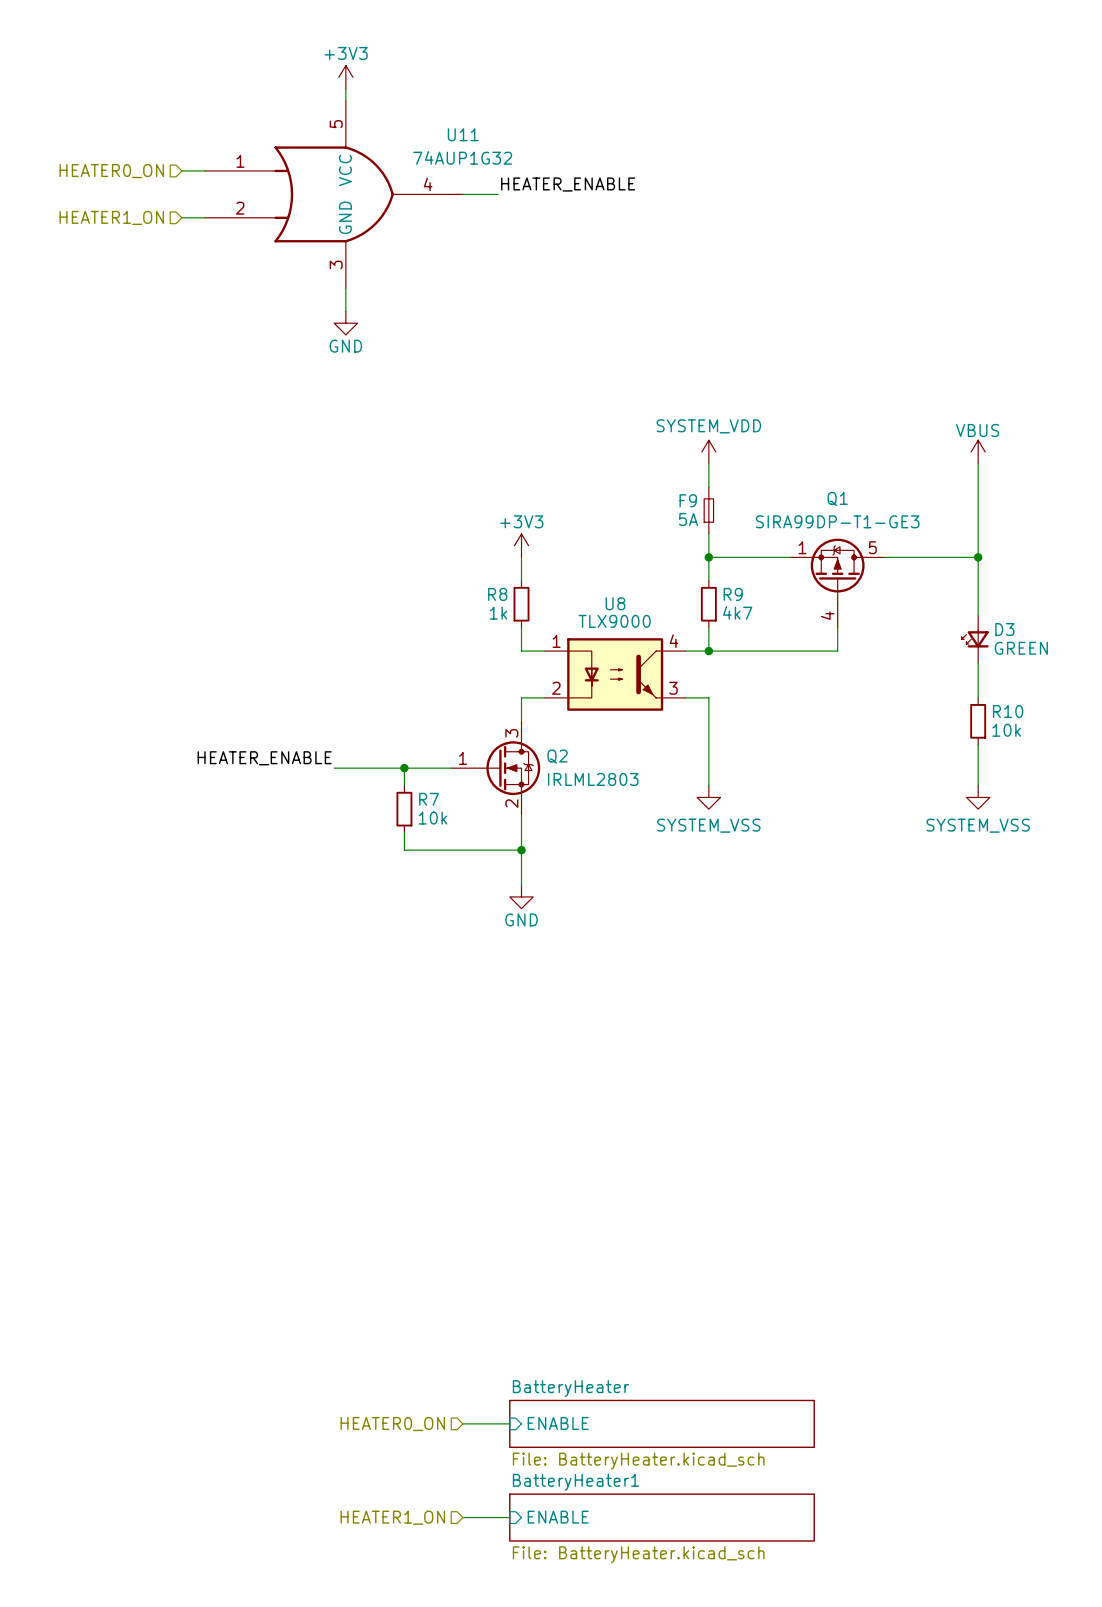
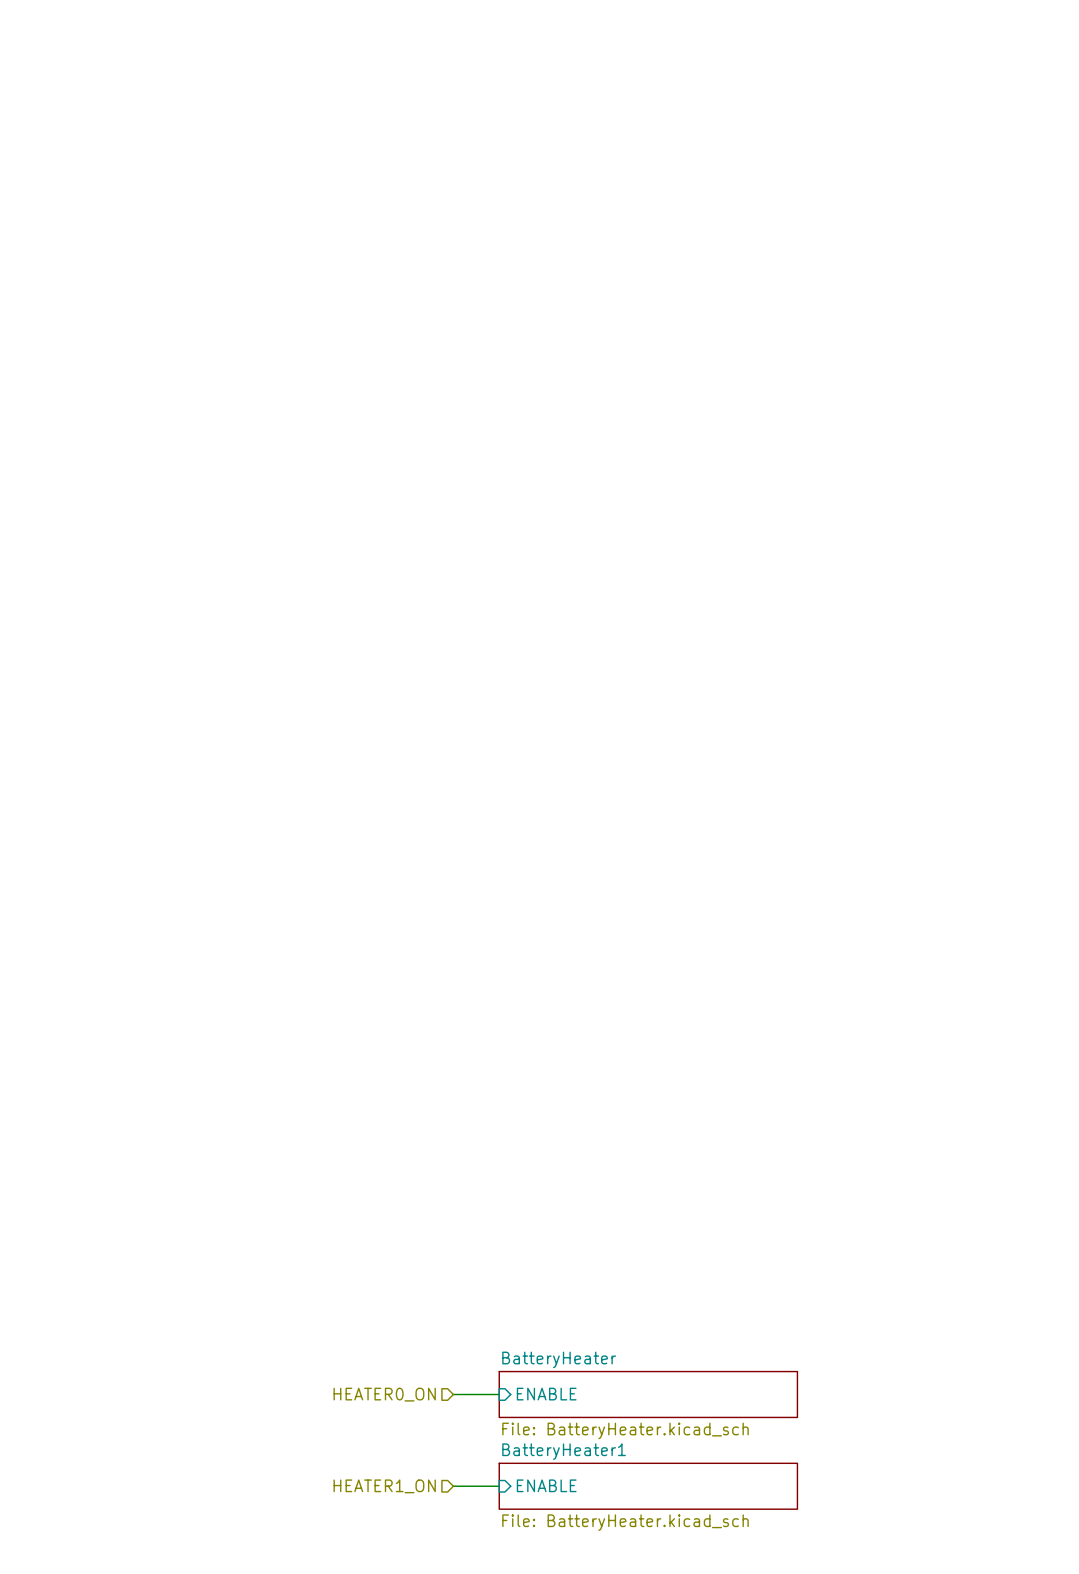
power symbol: +3V3 (345, 77) -> none
wire: (345, 89) (345, 100) -> none
wire: (181, 170) (205, 170) -> none
hierarchical label: HEATER0_ON (111, 171) -> none
label: HEATER_ENABLE (568, 184) -> none
U11: 74AUP1G32 (334, 194) -> none
wire: (462, 194) (498, 194) -> none
hierarchical label: HEATER1_ON (111, 217) -> none
wire: (181, 217) (205, 217) -> none
wire: (345, 288) (345, 311) -> none
power symbol: GND (345, 323) -> none
power symbol: SYSTEM_VDD (708, 452) -> none
power symbol: VBUS (978, 452) -> none
wire: (708, 463) (708, 487) -> none
wire: (978, 463) (978, 615) -> none
F9: 5A (708, 510) -> none
wire: (708, 533) (708, 580) -> none
power symbol: +3V3 (521, 545) -> none
wire: (521, 557) (521, 580) -> none
wire: (708, 557) (790, 557) -> none
junction: (708, 557) -> none
wire: (884, 557) (978, 557) -> none
junction: (978, 557) -> none
Q1: SIRA99DP-T1-GE3 (837, 583) -> none
R8: 1k (521, 604) -> none
R9: 4k7 (708, 604) -> none
wire: (521, 627) (521, 651) (544, 651) -> none
wire: (708, 627) (708, 651) -> none
wire: (837, 627) (837, 651) (685, 651) -> none
D3: GREEN (975, 639) -> none
junction: (708, 651) -> none
wire: (978, 662) (978, 697) -> none
U8: TLX9000 (615, 674) -> none
wire: (544, 697) (521, 697) (521, 721) -> none
wire: (685, 697) (708, 697) (708, 785) -> none
R10: 10k (978, 721) -> none
wire: (978, 744) (978, 785) -> none
label: HEATER_ENABLE (264, 758) -> none
wire: (334, 768) (451, 768) -> none
wire: (404, 768) (404, 785) -> none
junction: (404, 768) -> none
Q2: IRLML2803 (495, 768) -> none
power symbol: SYSTEM_VSS (708, 797) -> none
power symbol: SYSTEM_VSS (978, 797) -> none
R7: 10k (404, 809) -> none
wire: (521, 815) (521, 885) -> none
wire: (404, 832) (404, 850) (521, 850) -> none
junction: (521, 850) -> none
power symbol: GND (521, 896) -> none

